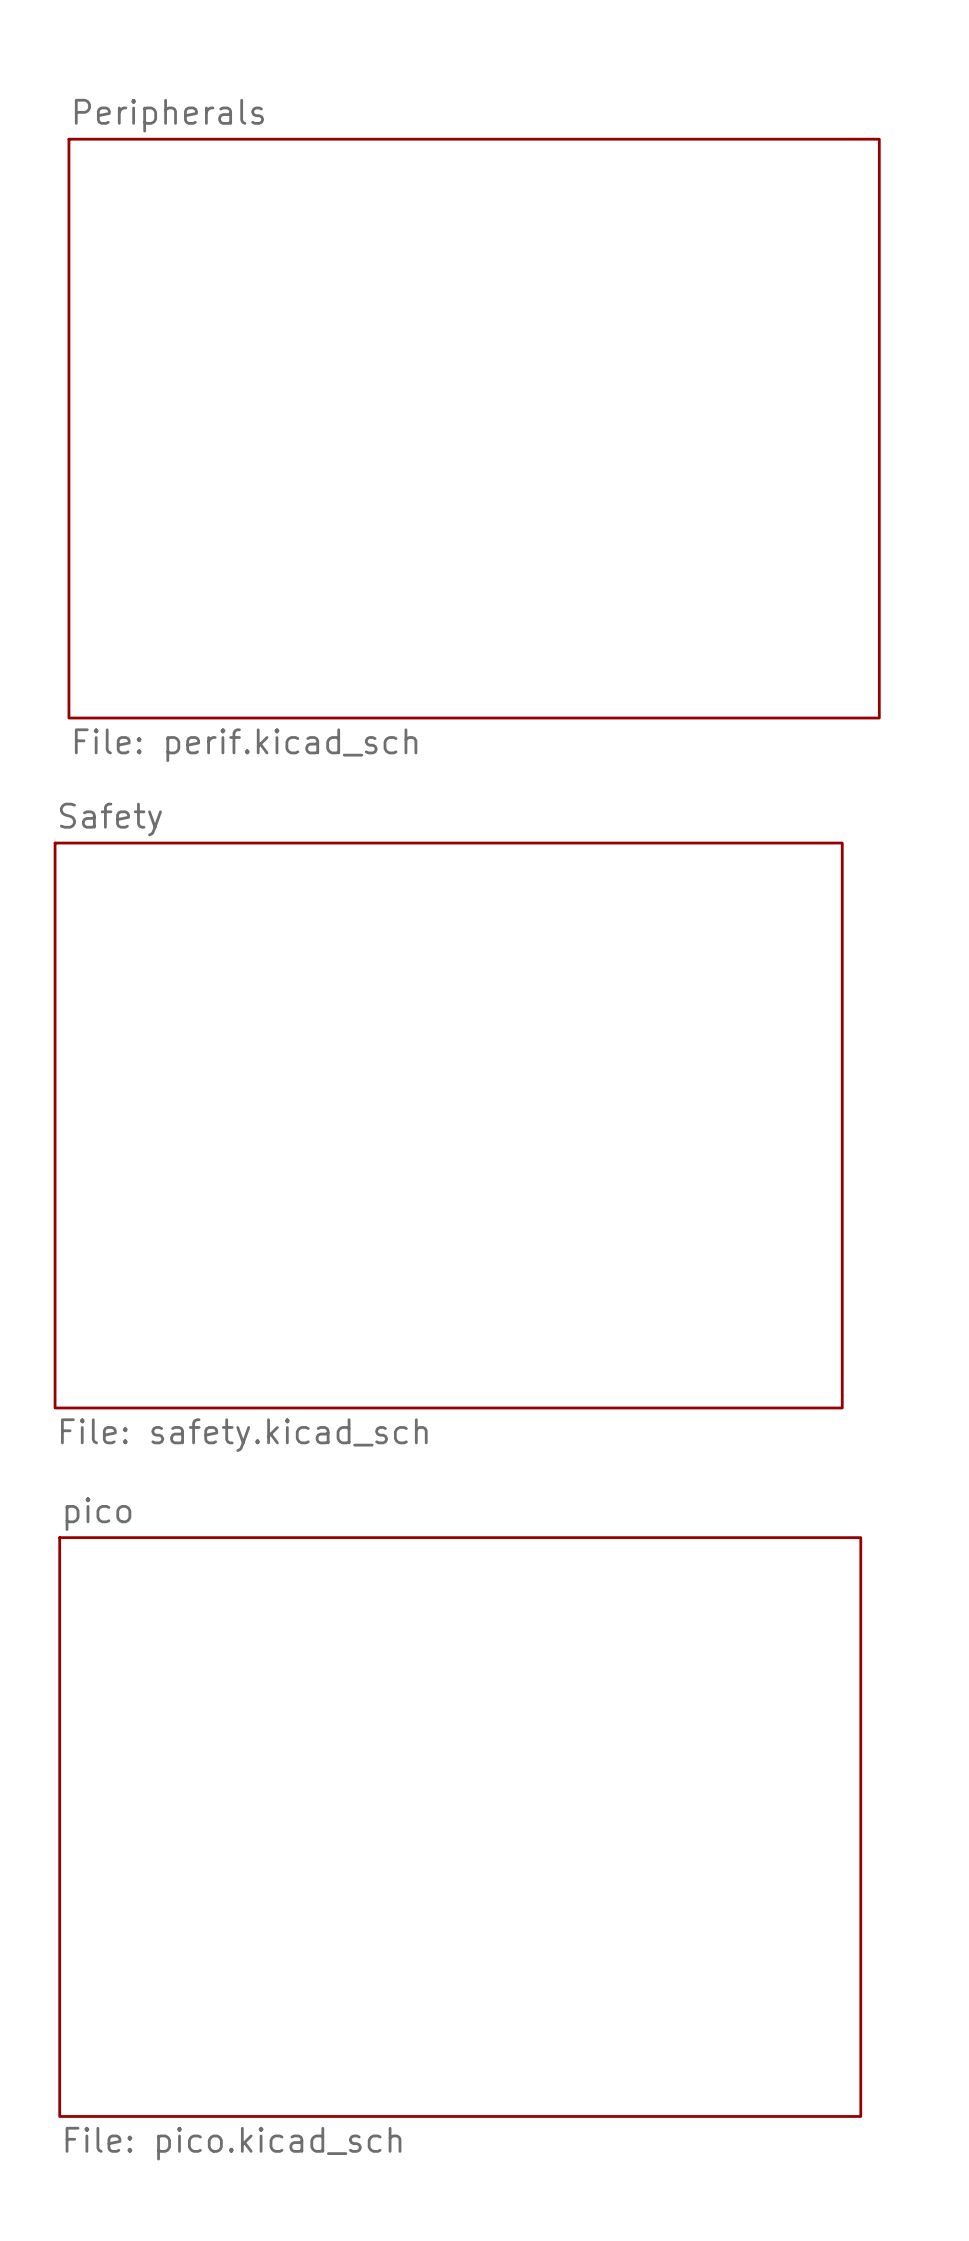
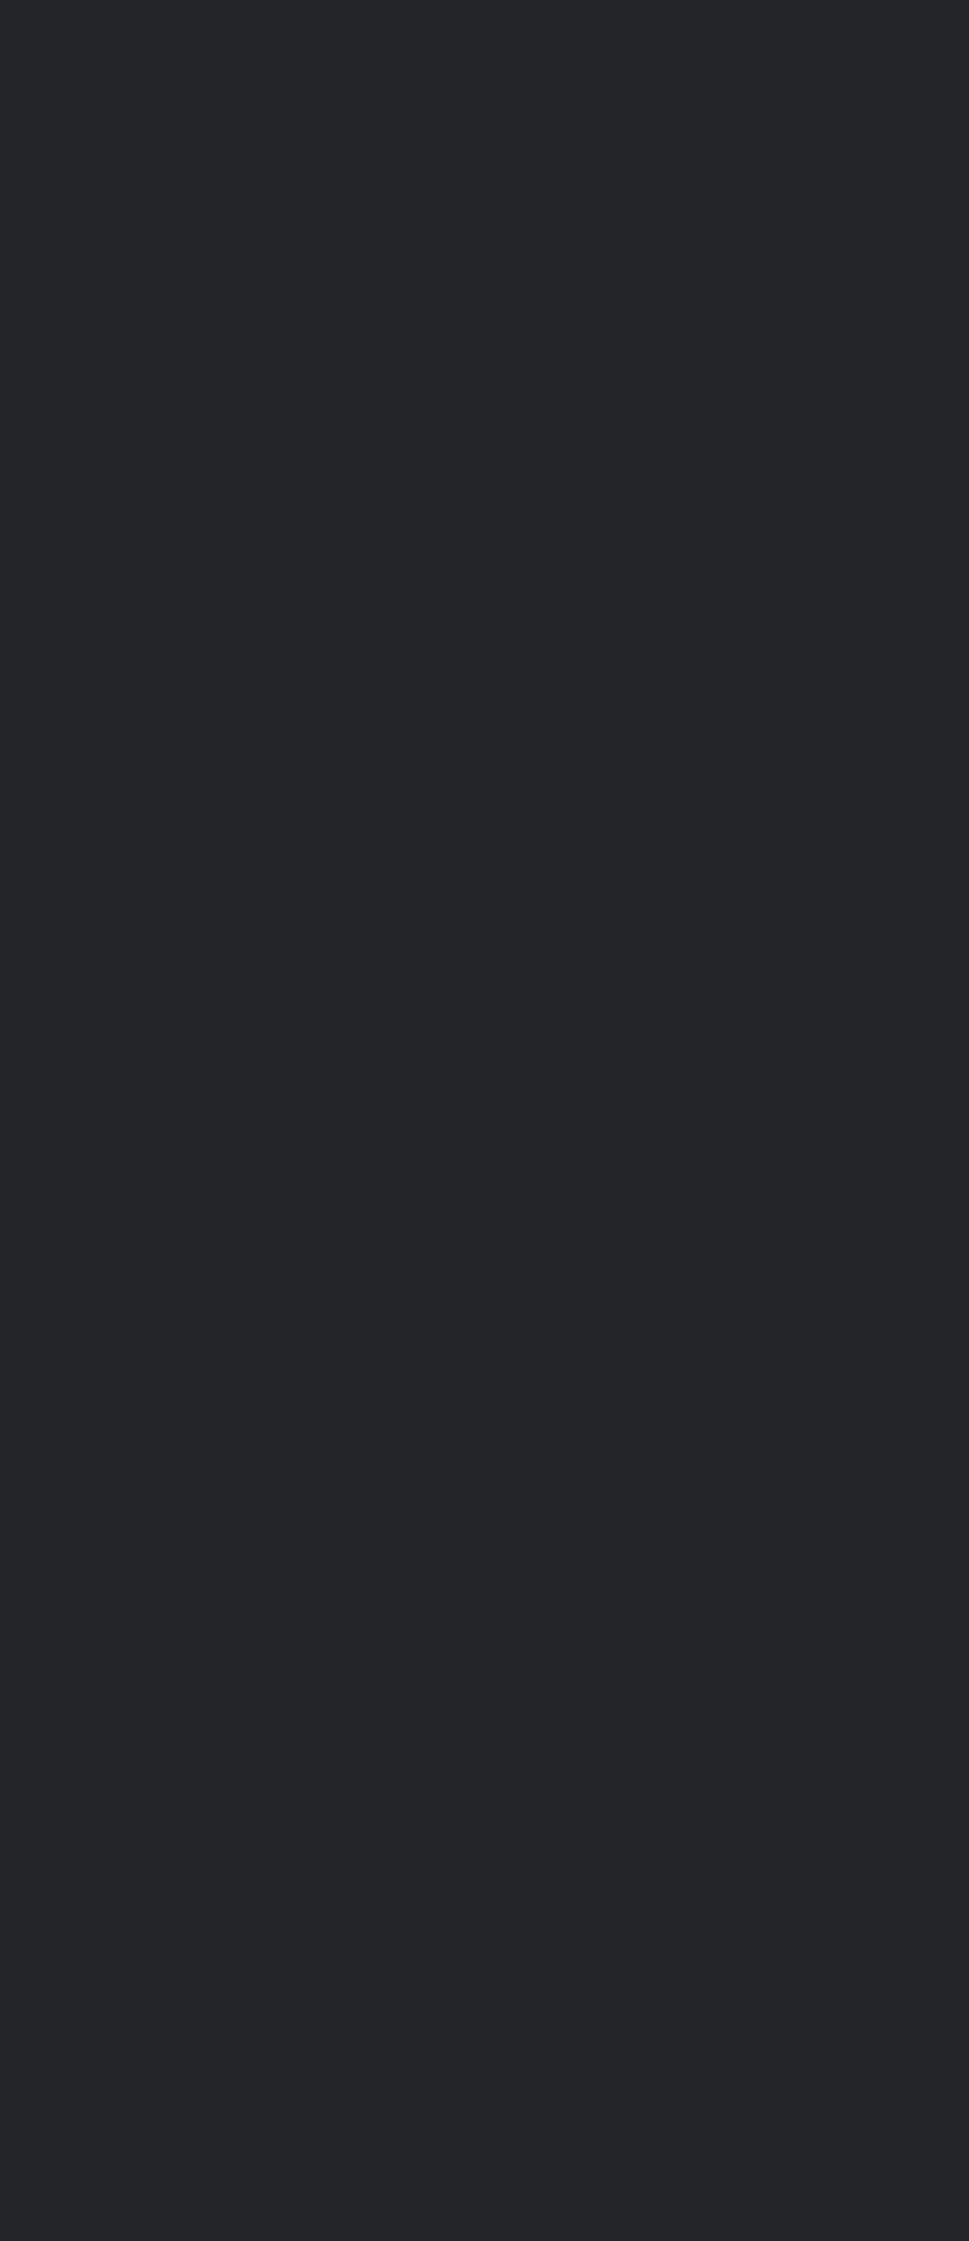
sheet Peripherals: File: perif.kicad_sch (474, 428) -> none
sheet Safety: File: safety.kicad_sch (448, 1125) -> none
sheet pico: File: pico.kicad_sch (460, 1827) -> none

